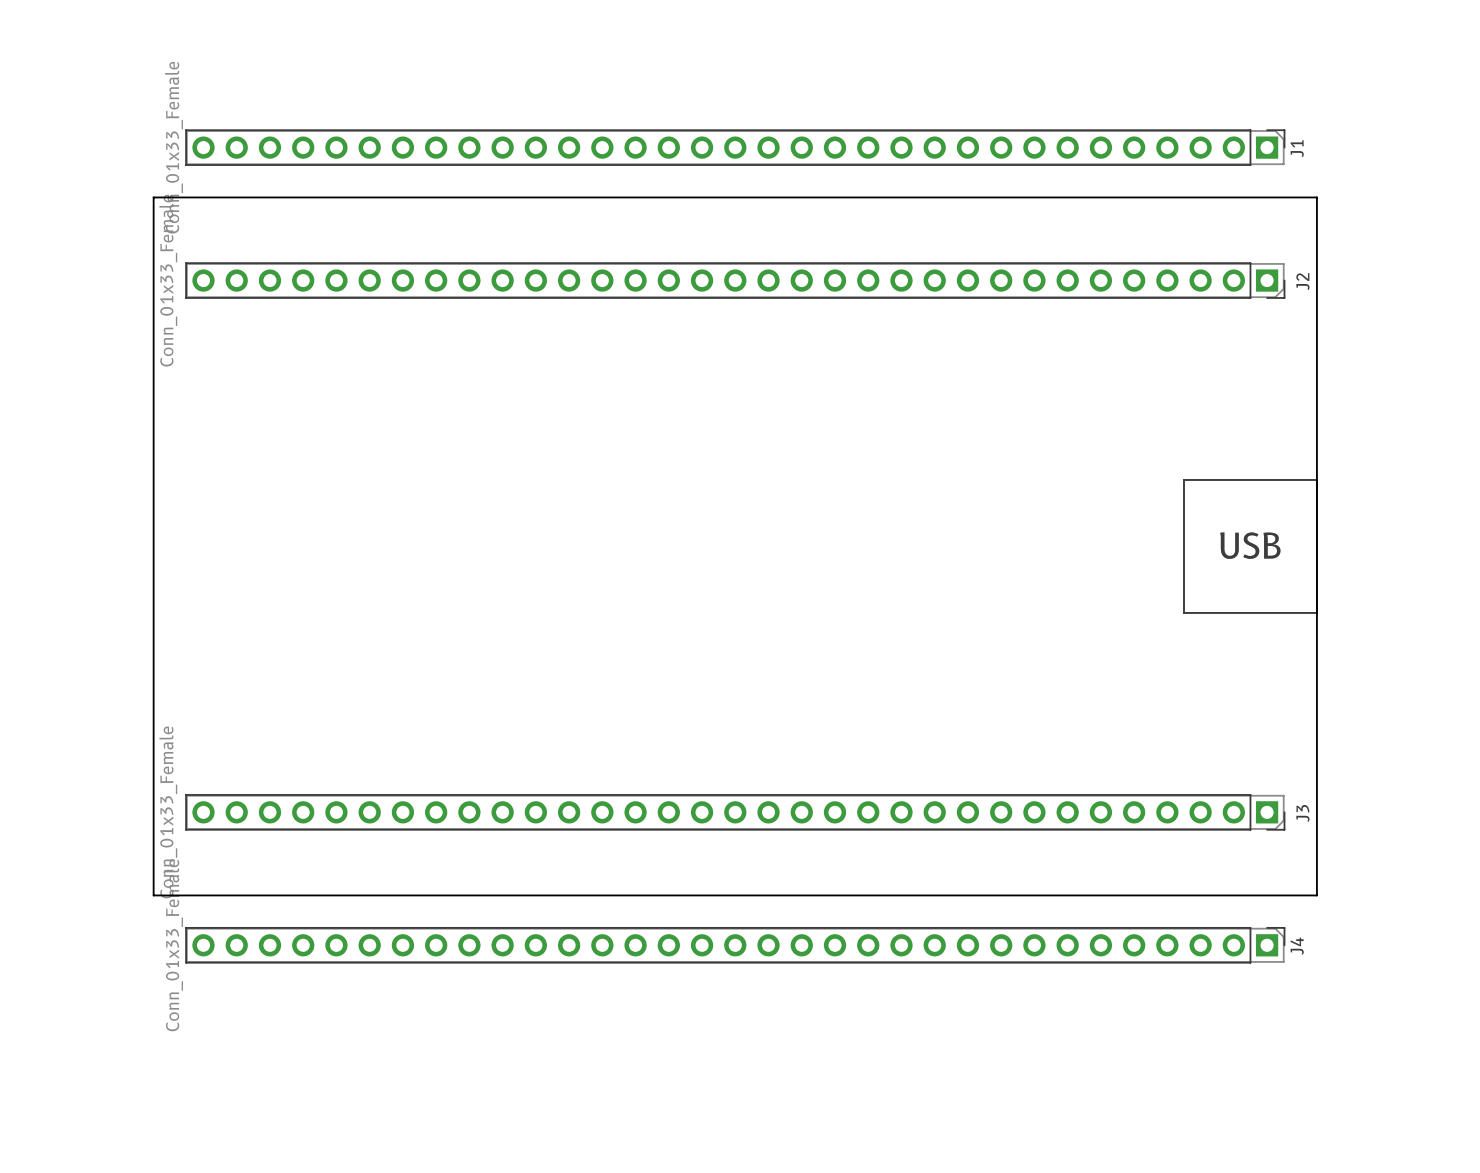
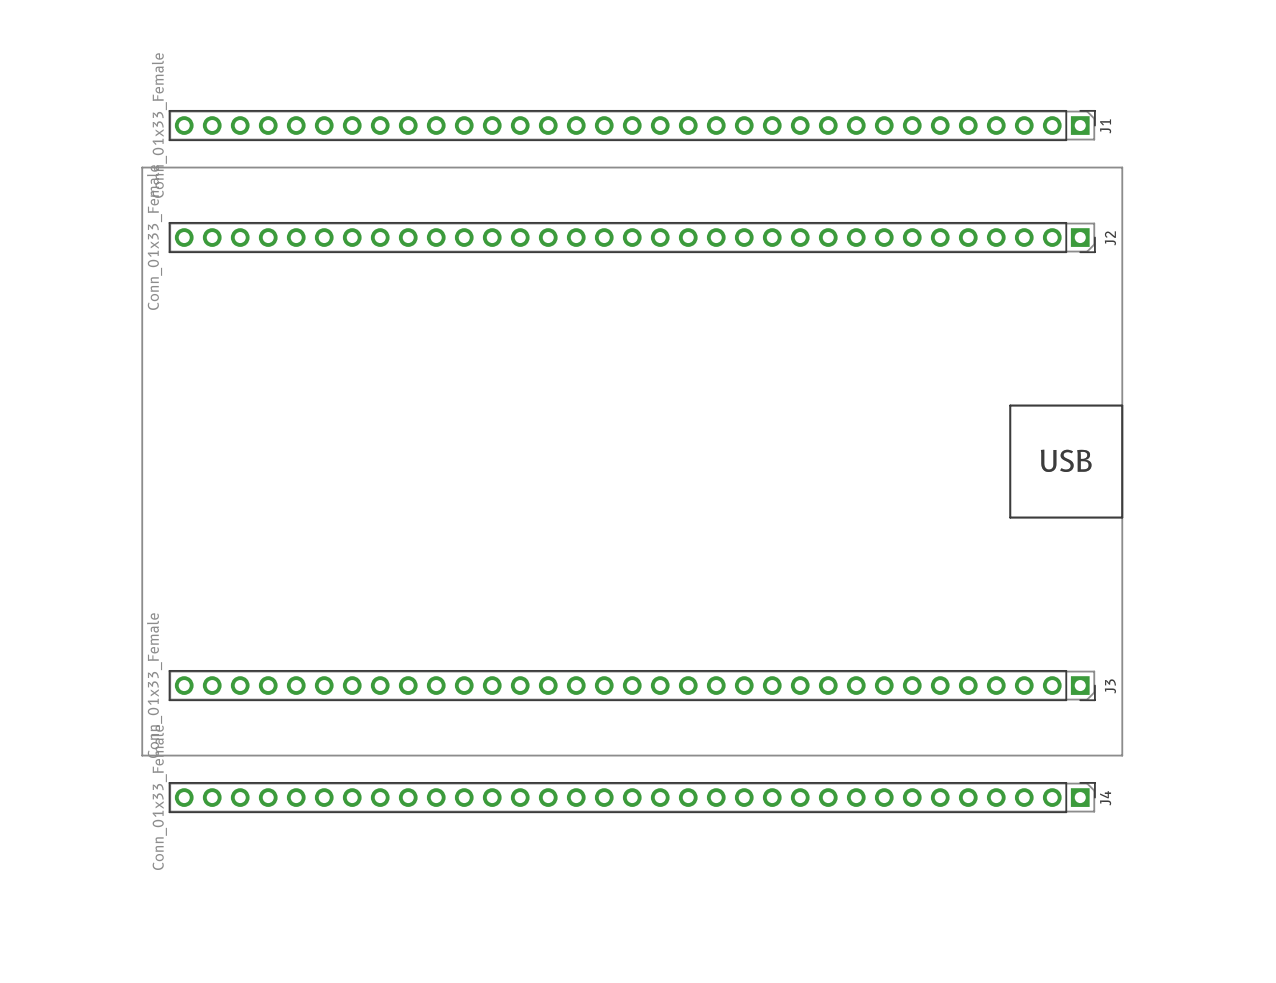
board edge: (153, 197) (153, 895) (1316, 895) (1316, 197) (153, 197) -> none
line: none -> (1122, 405) (1122, 167) (142, 167) (142, 755) (1122, 755) (1122, 517)

